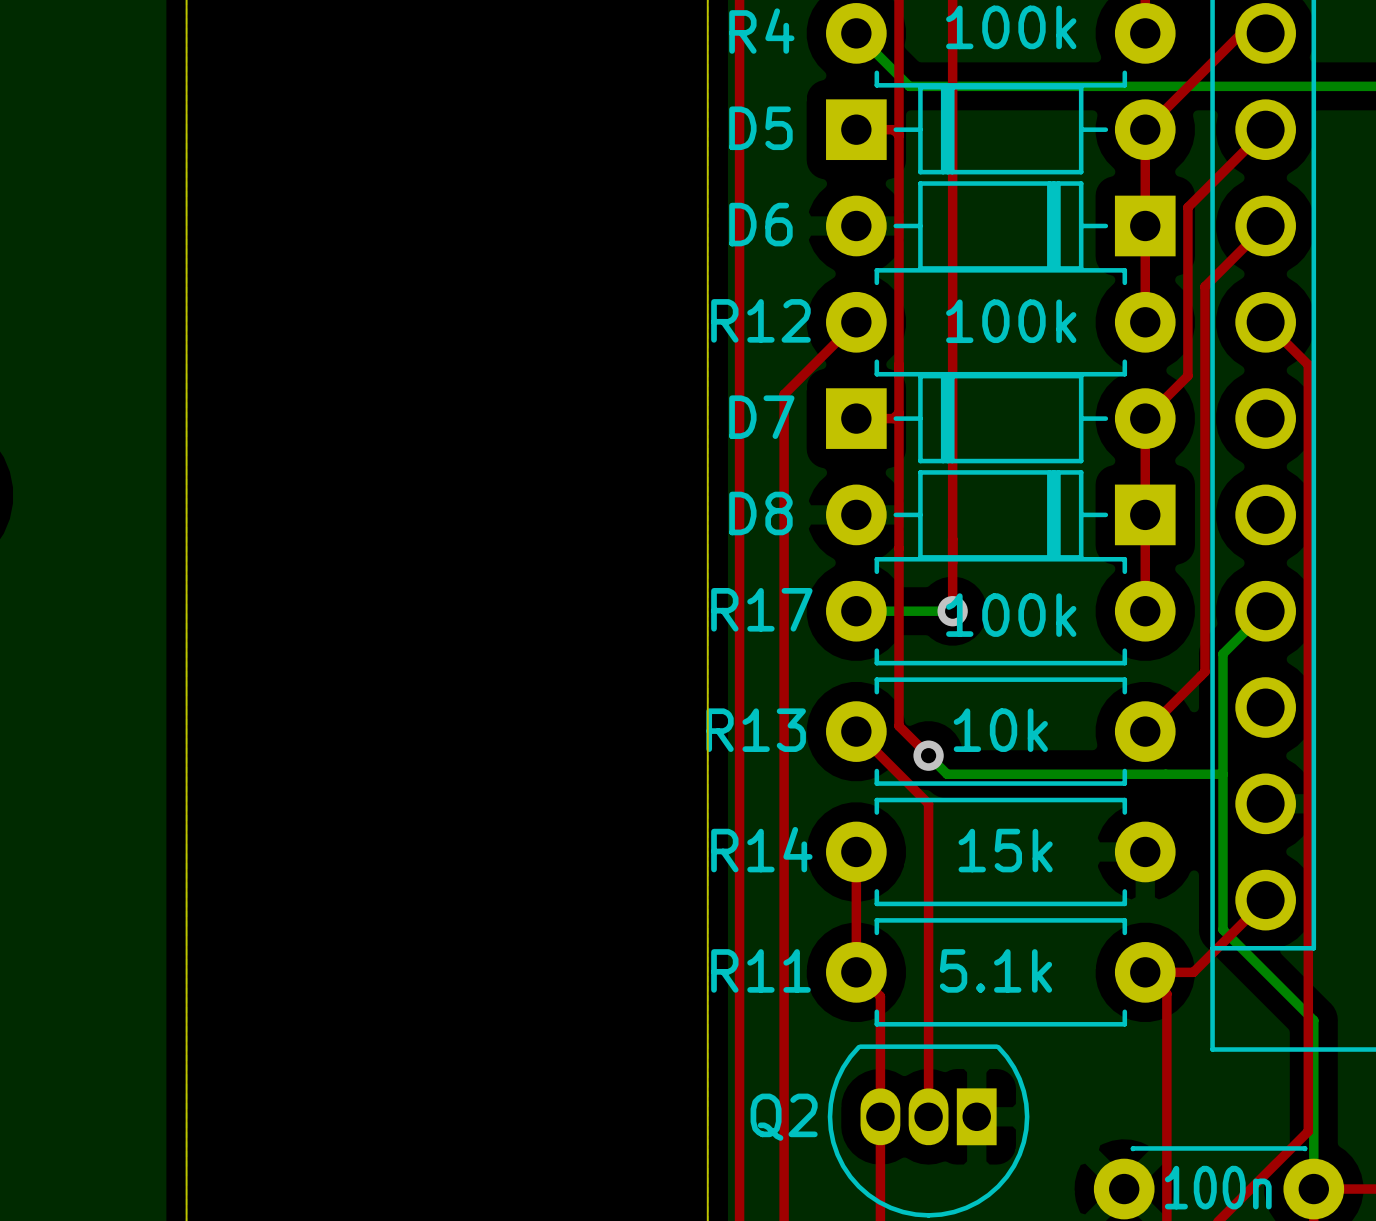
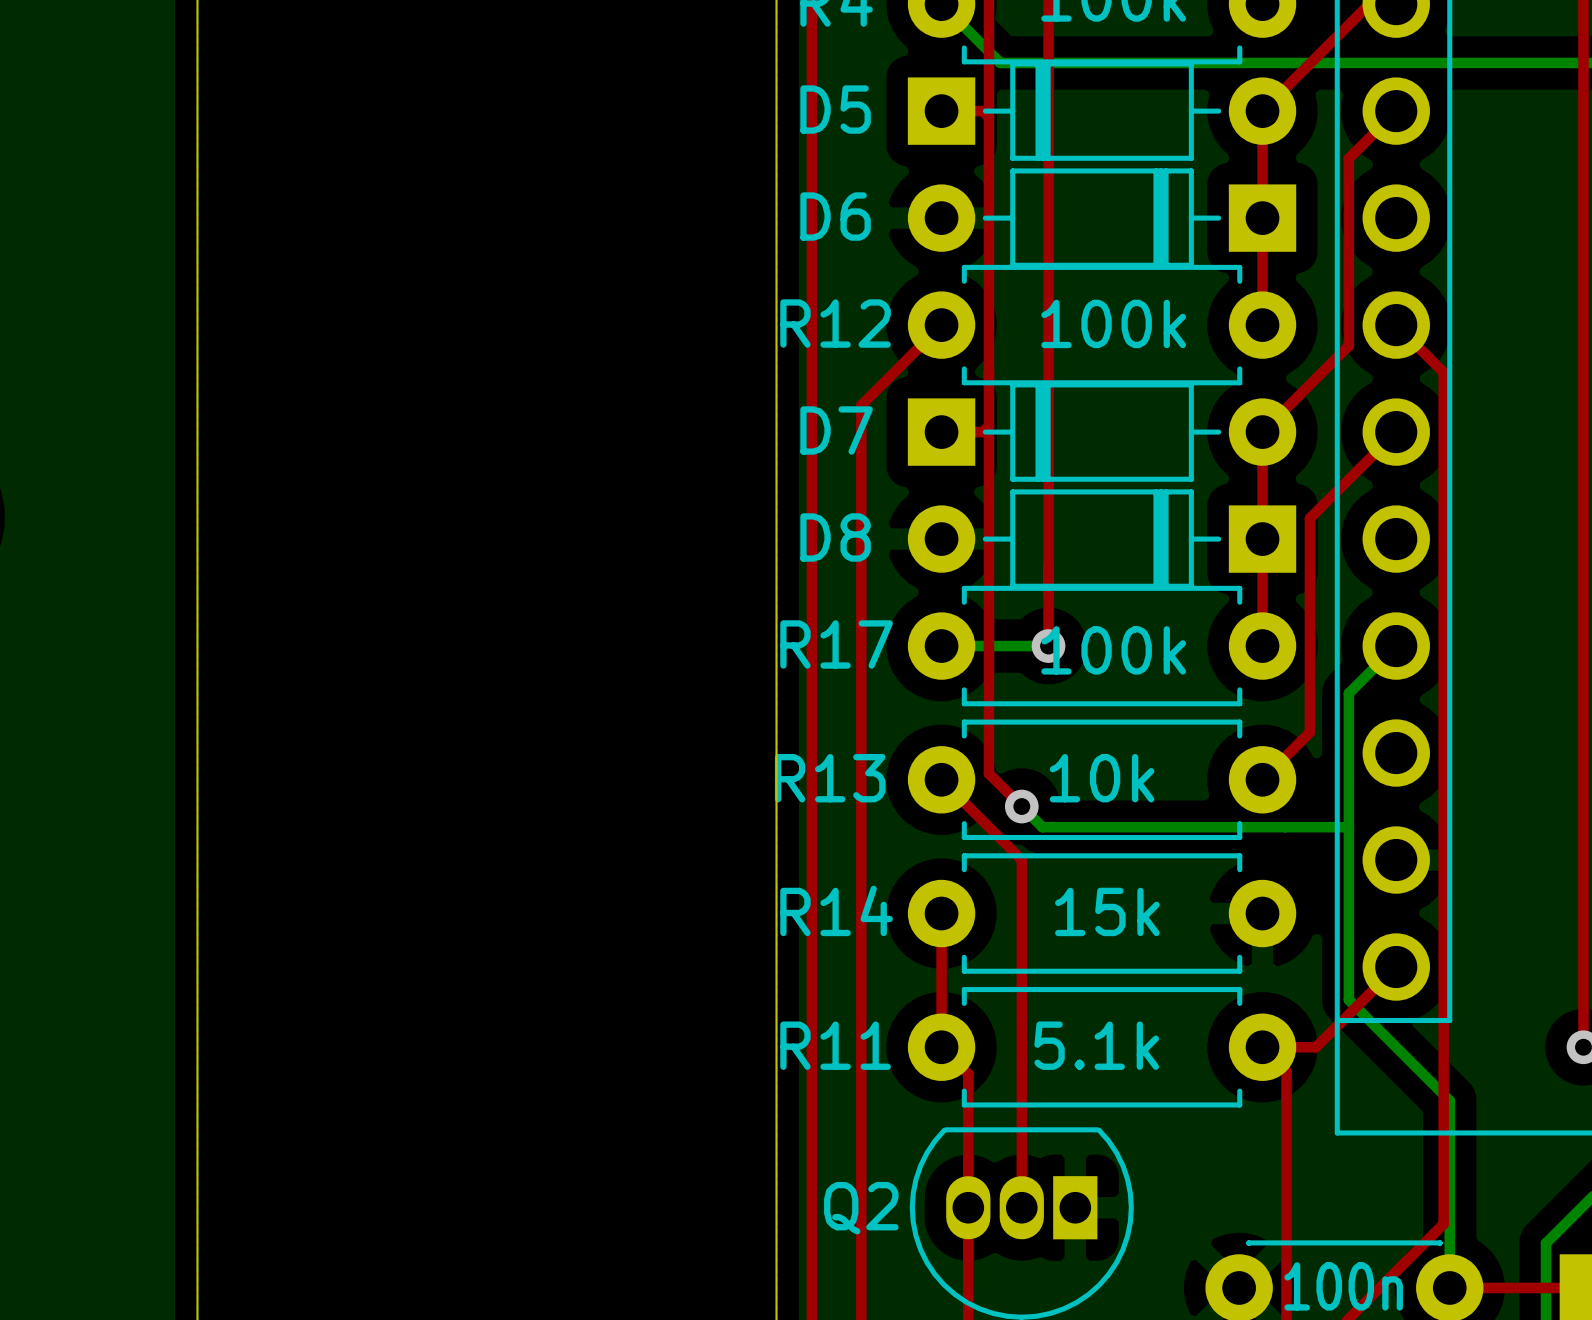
top track: (1222, 172) (1187, 207) (1187, 375) -> (1348, 158) (1348, 345) (1309, 384)
top track: (1265, 225) (1204, 286) (1204, 671) (1187, 688) -> (1396, 432) (1309, 518) (1309, 732)

